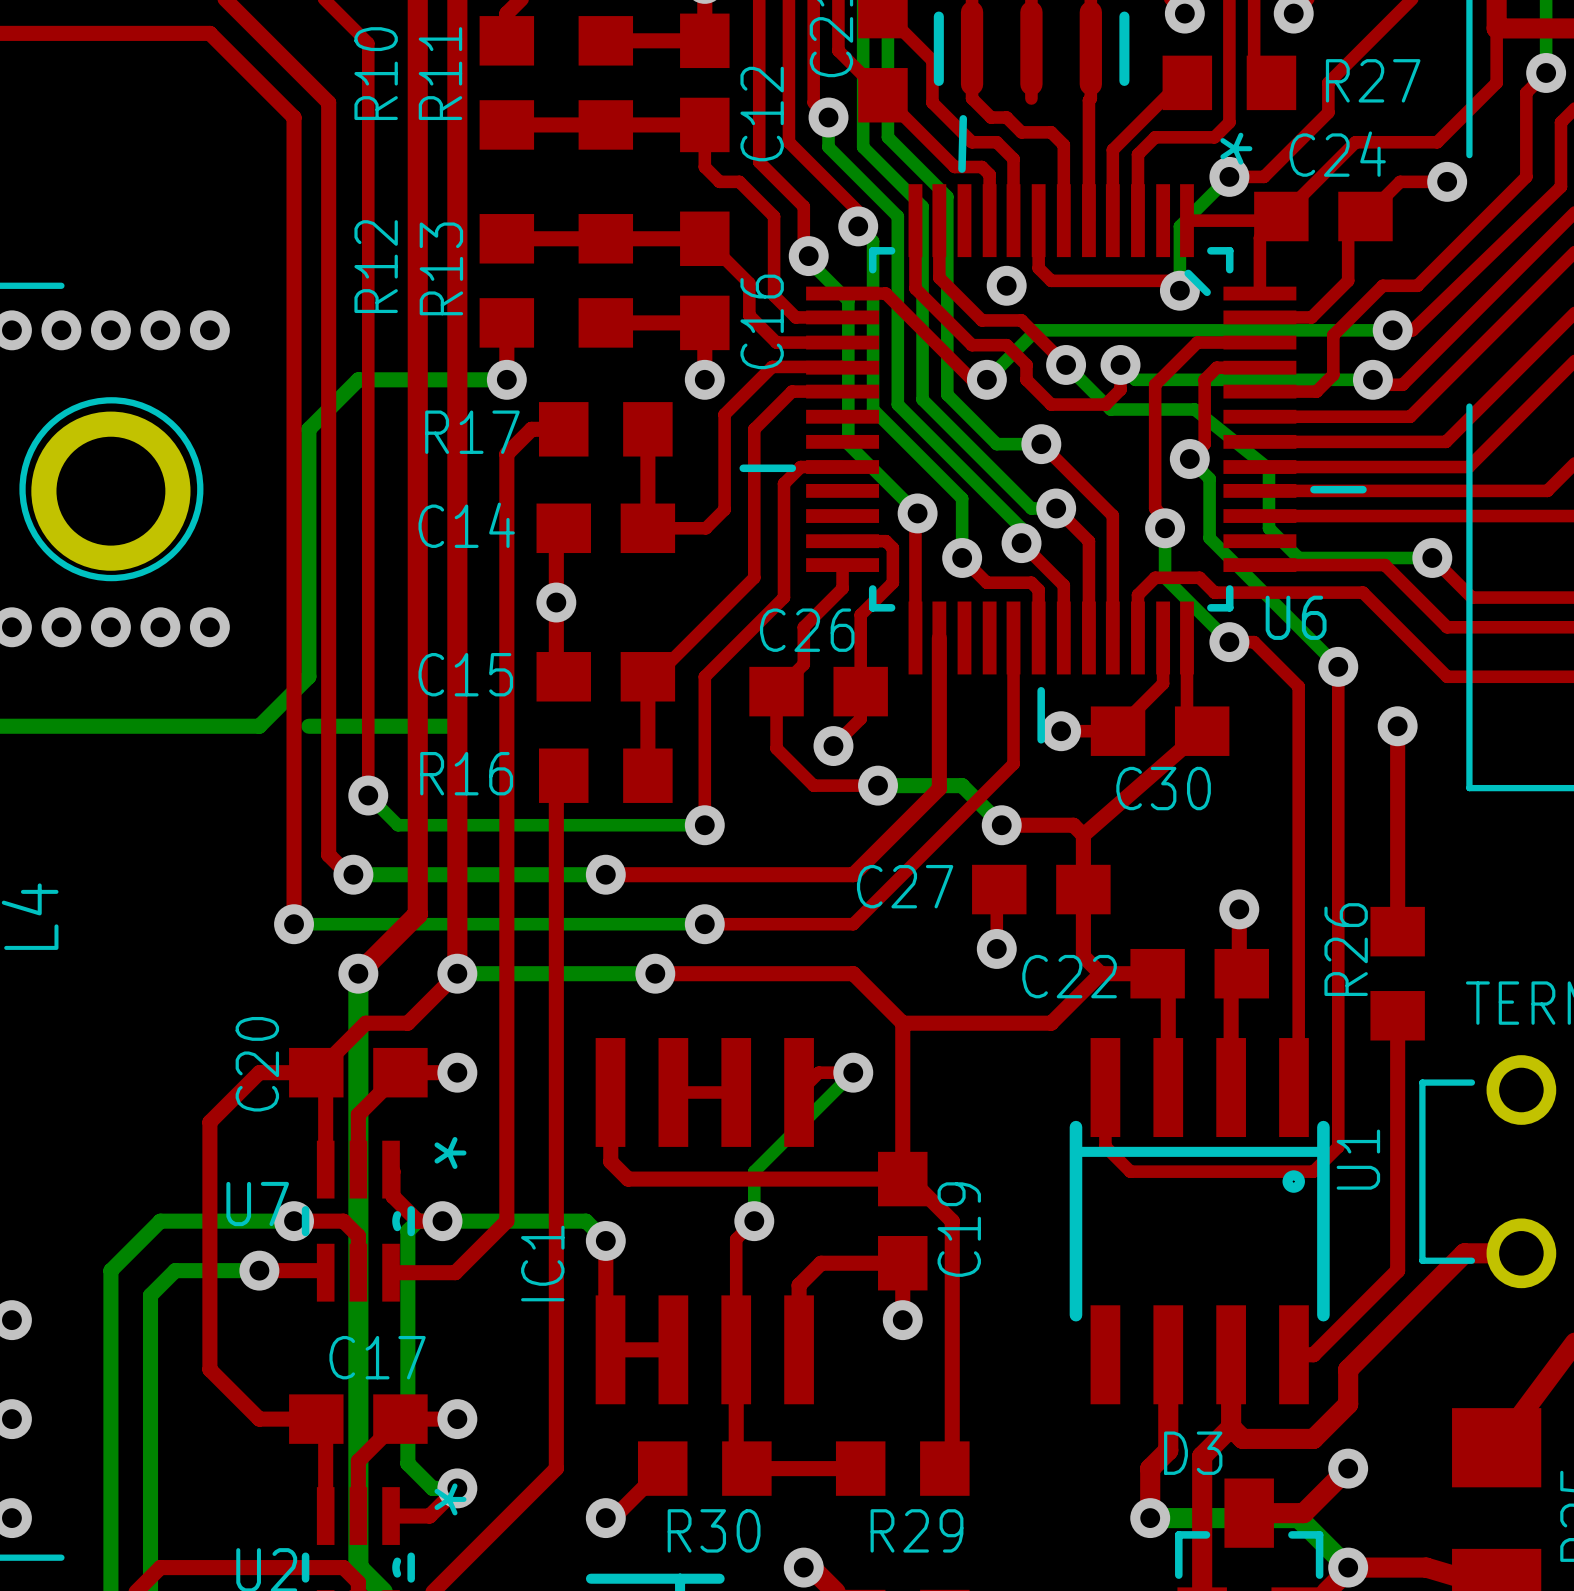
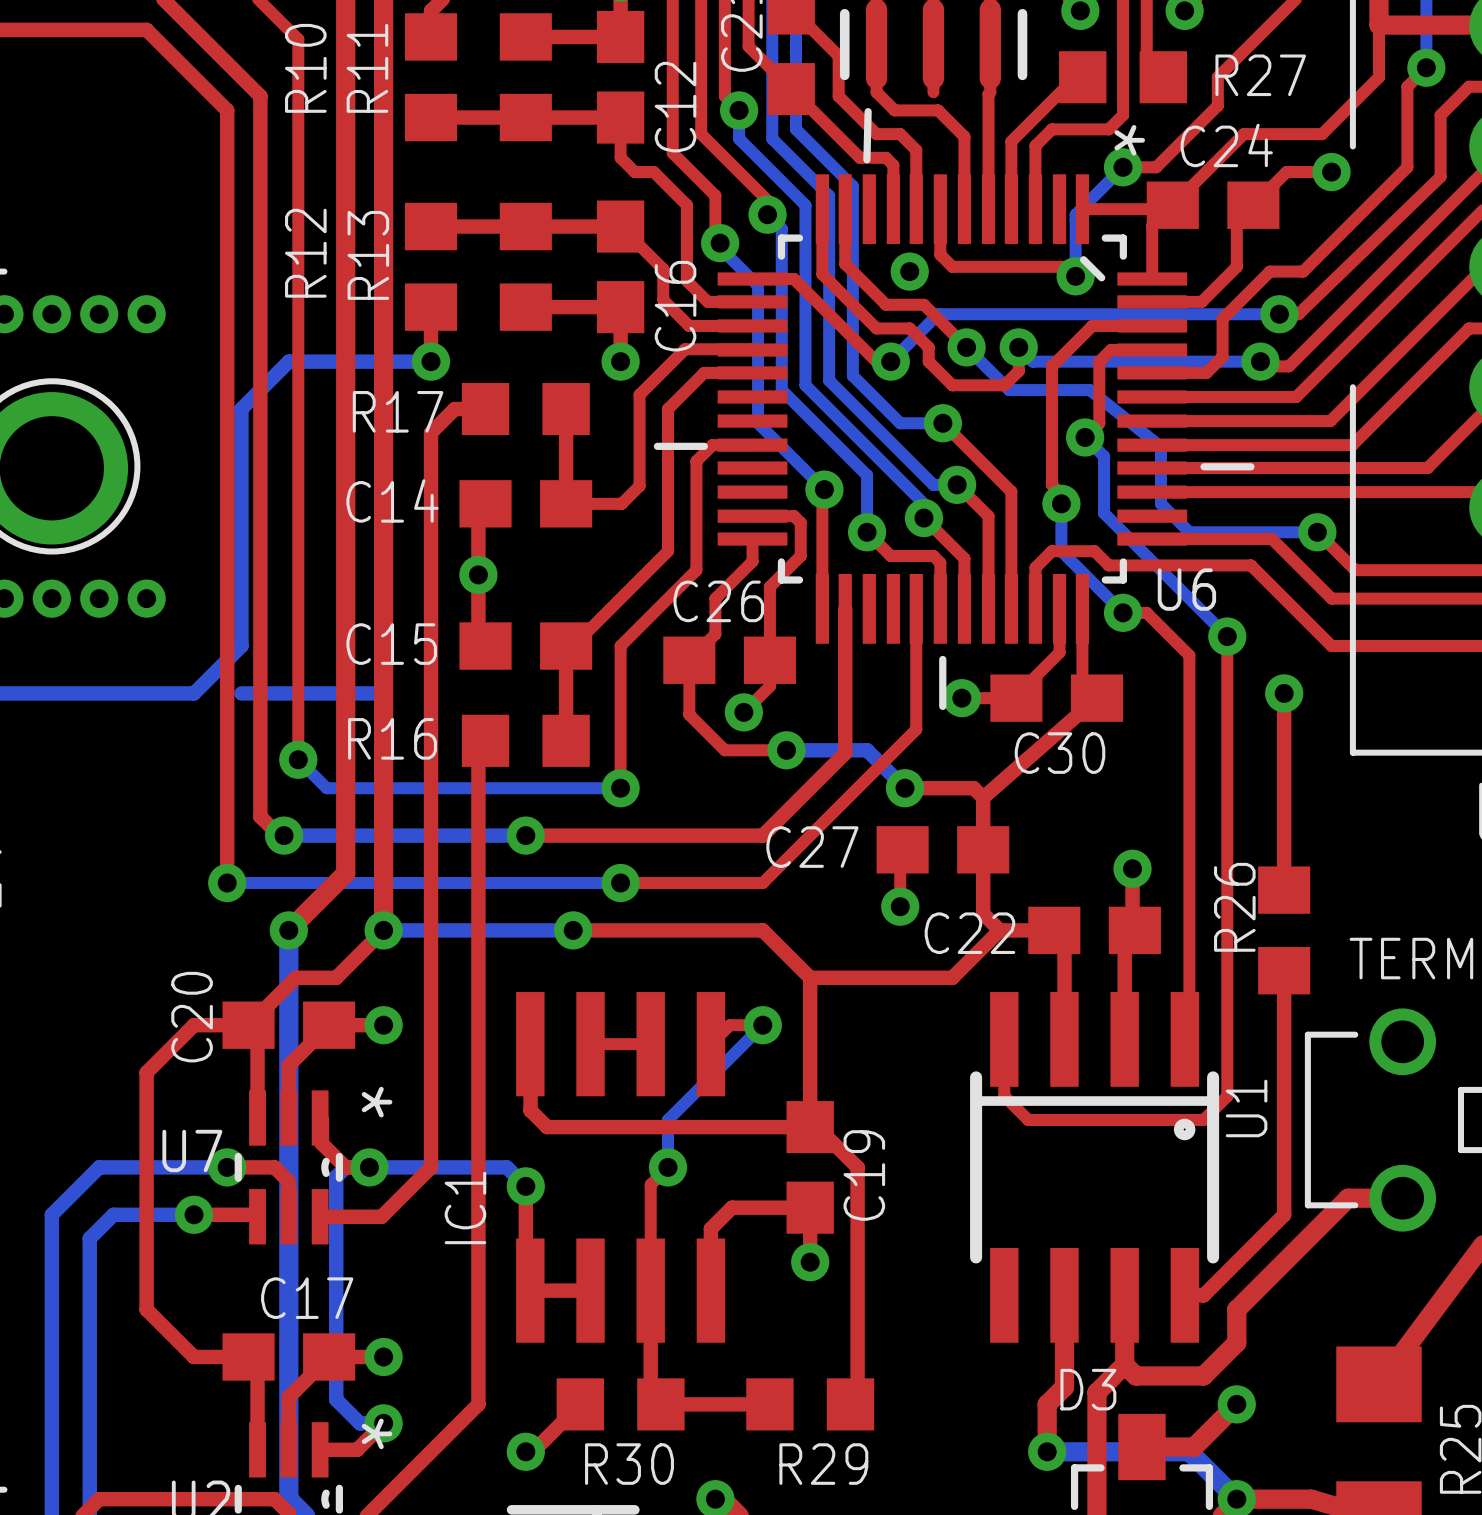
top track: (1006, 117) (1021, 132) (1051, 132) -> (909, 110) (938, 110) (952, 124)

